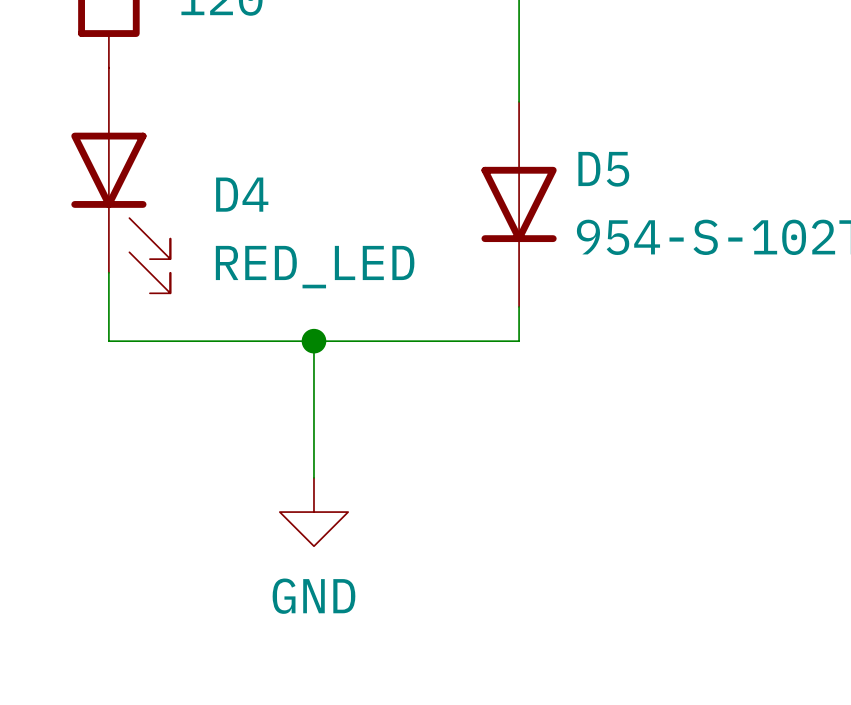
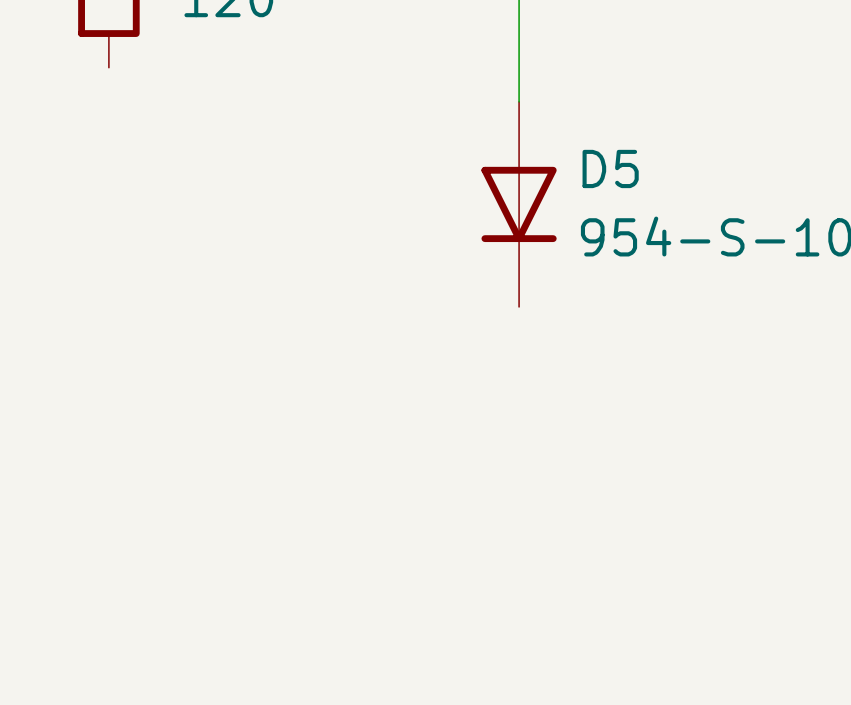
D4: RED_LED (120, 180) -> none
wire: (108, 272) (108, 341) (519, 341) (519, 306) -> none
wire: (313, 341) (313, 477) -> none
junction: (313, 341) -> none
power symbol: GND (313, 512) -> none

